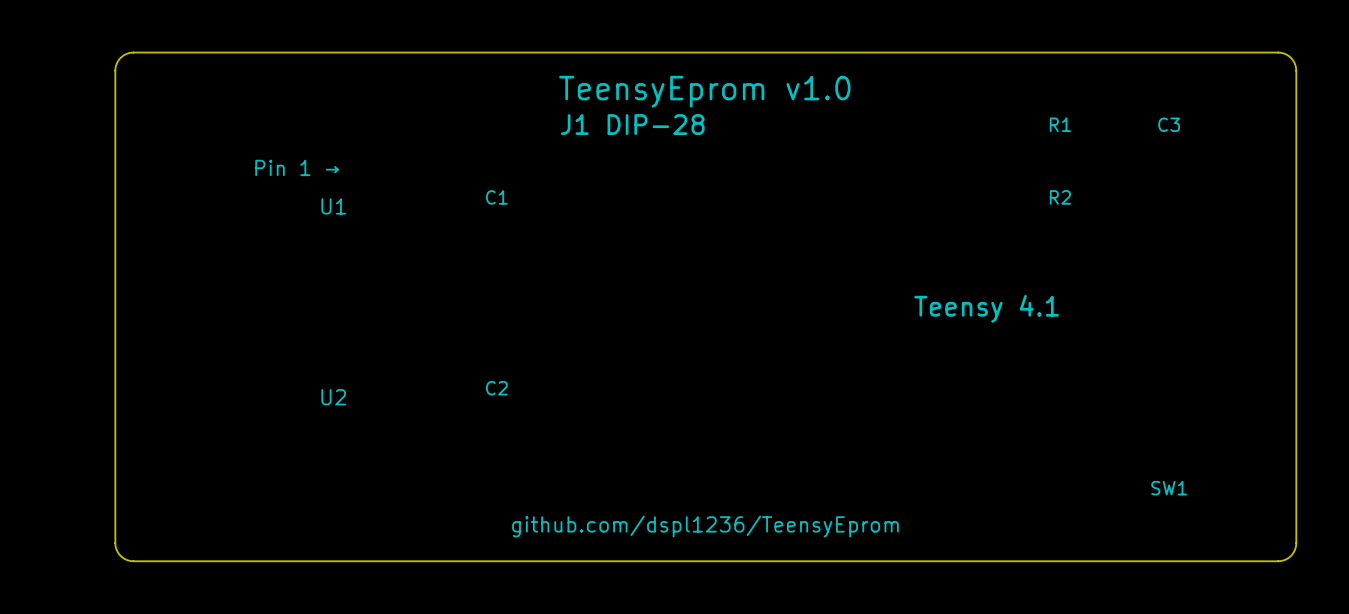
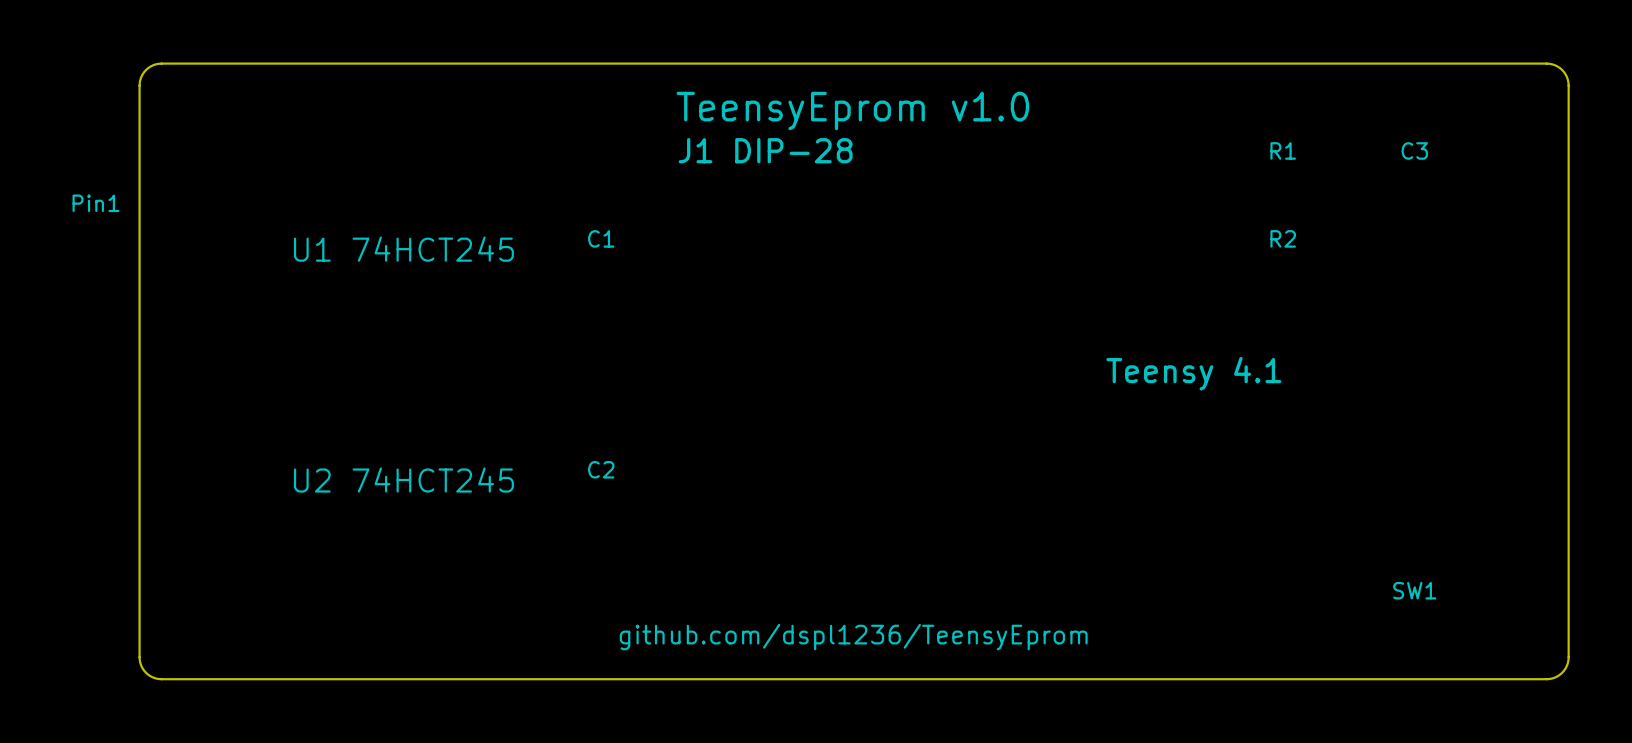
text: none -> Pin1 (95, 203)
text: Pin 1 → (297, 167) -> none
text: U1 (333, 206) -> U1 74HCT245 (403, 249)
text: U2 (333, 397) -> U2 74HCT245 (403, 479)

